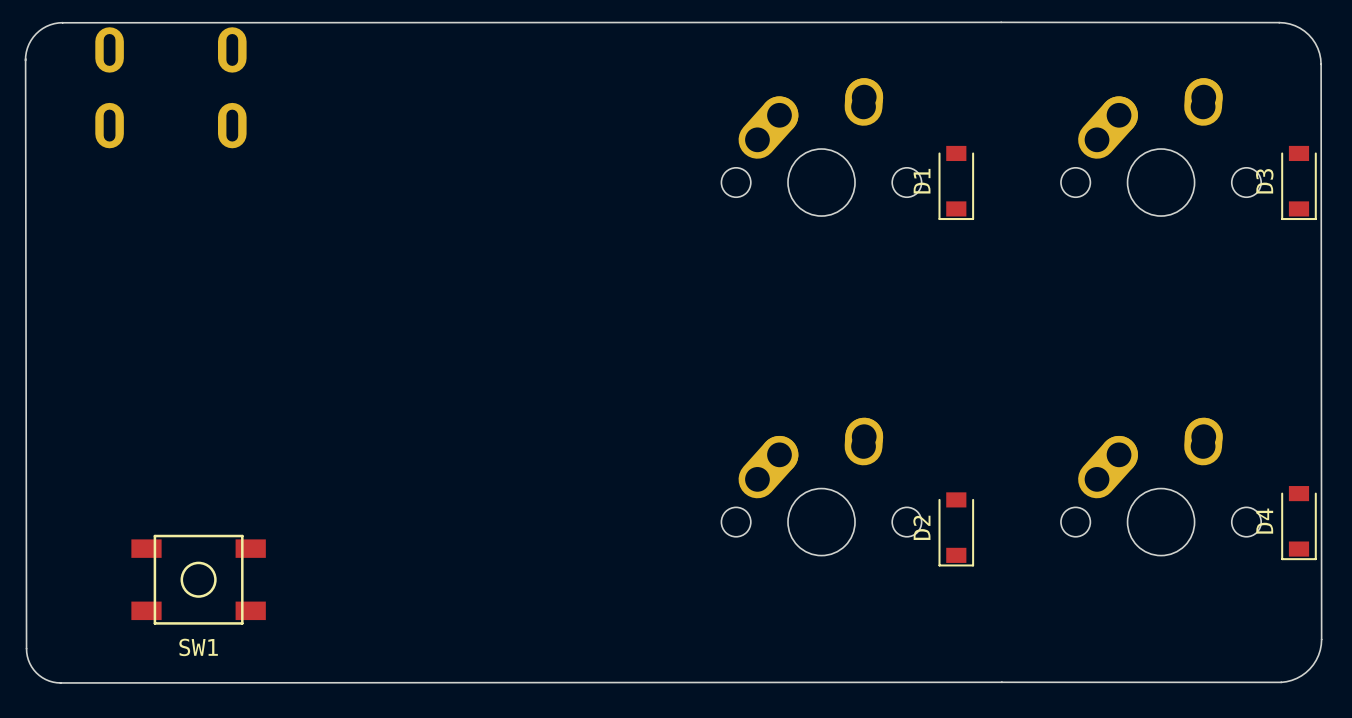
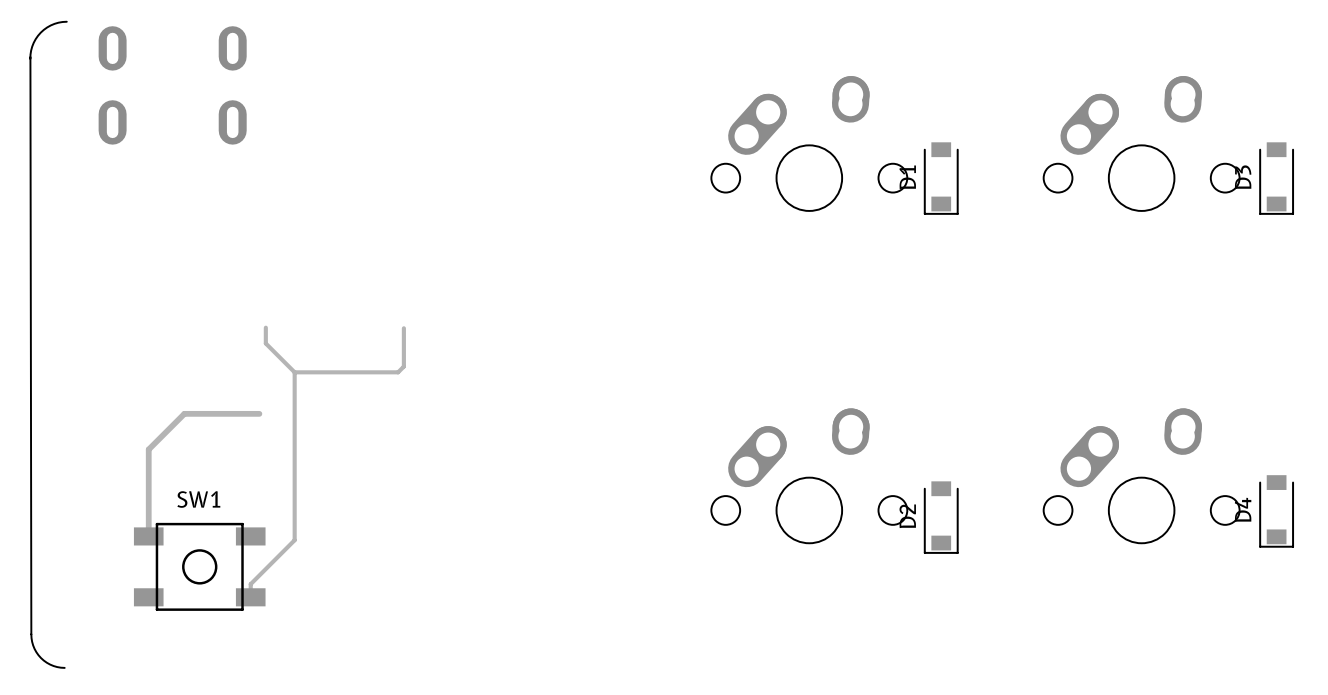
board edge: (62, 22) (1279, 22) (1295, 25) (1312, 38) (1319, 53) (1321, 64) (1321, 639) (1318, 655) (1309, 668) (1296, 678) (1281, 682) (60, 682) -> none
track: none -> (265, 327) (265, 343) (294, 372)
track: none -> (403, 328) (403, 366) (398, 372) (294, 372)
track: none -> (294, 372) (294, 540) (250, 584) (250, 597)
track: none -> (259, 413) (184, 413) (148, 449) (148, 536)
SW1 name position: SW1 (198, 647) -> SW1 (198, 499)

